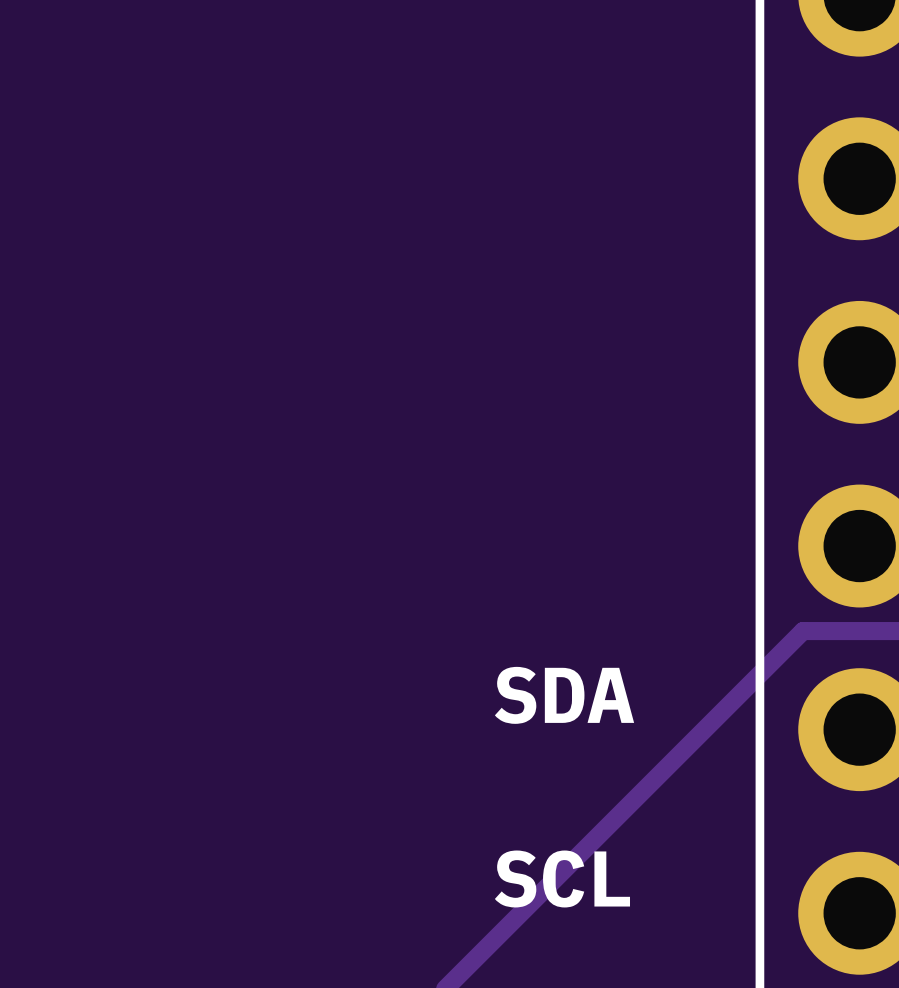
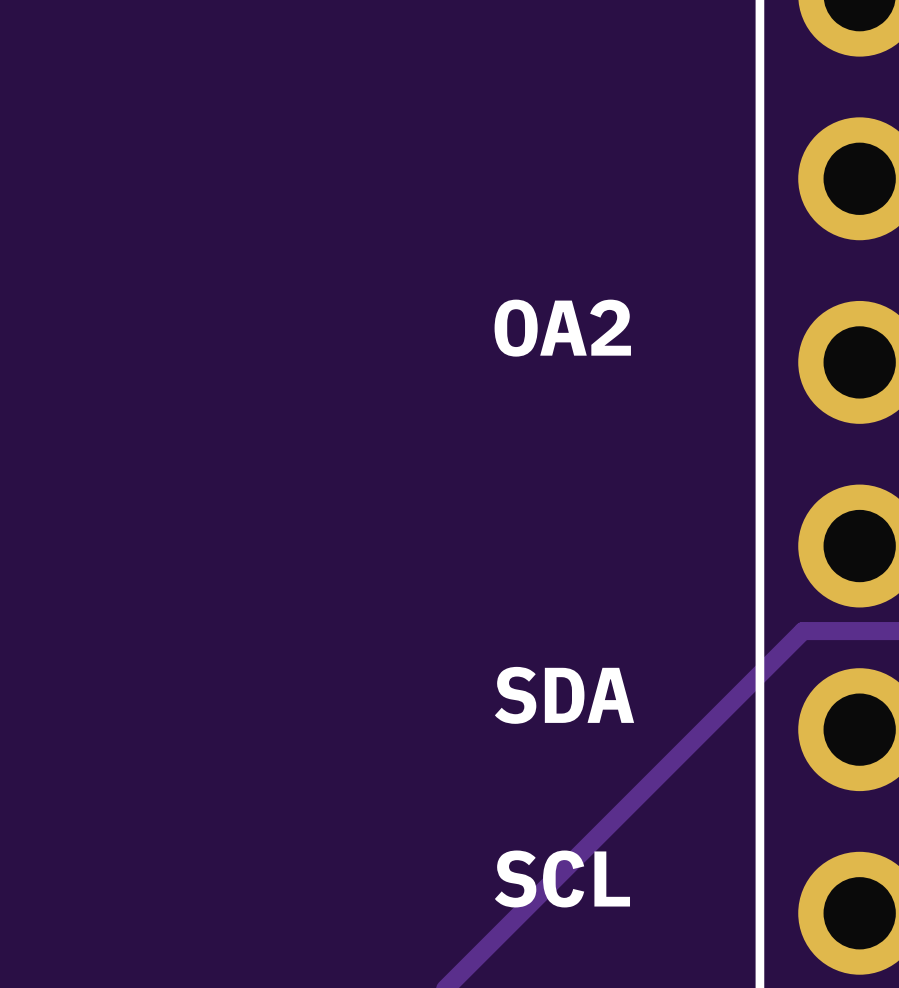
text: none -> OA2 (562, 328)

